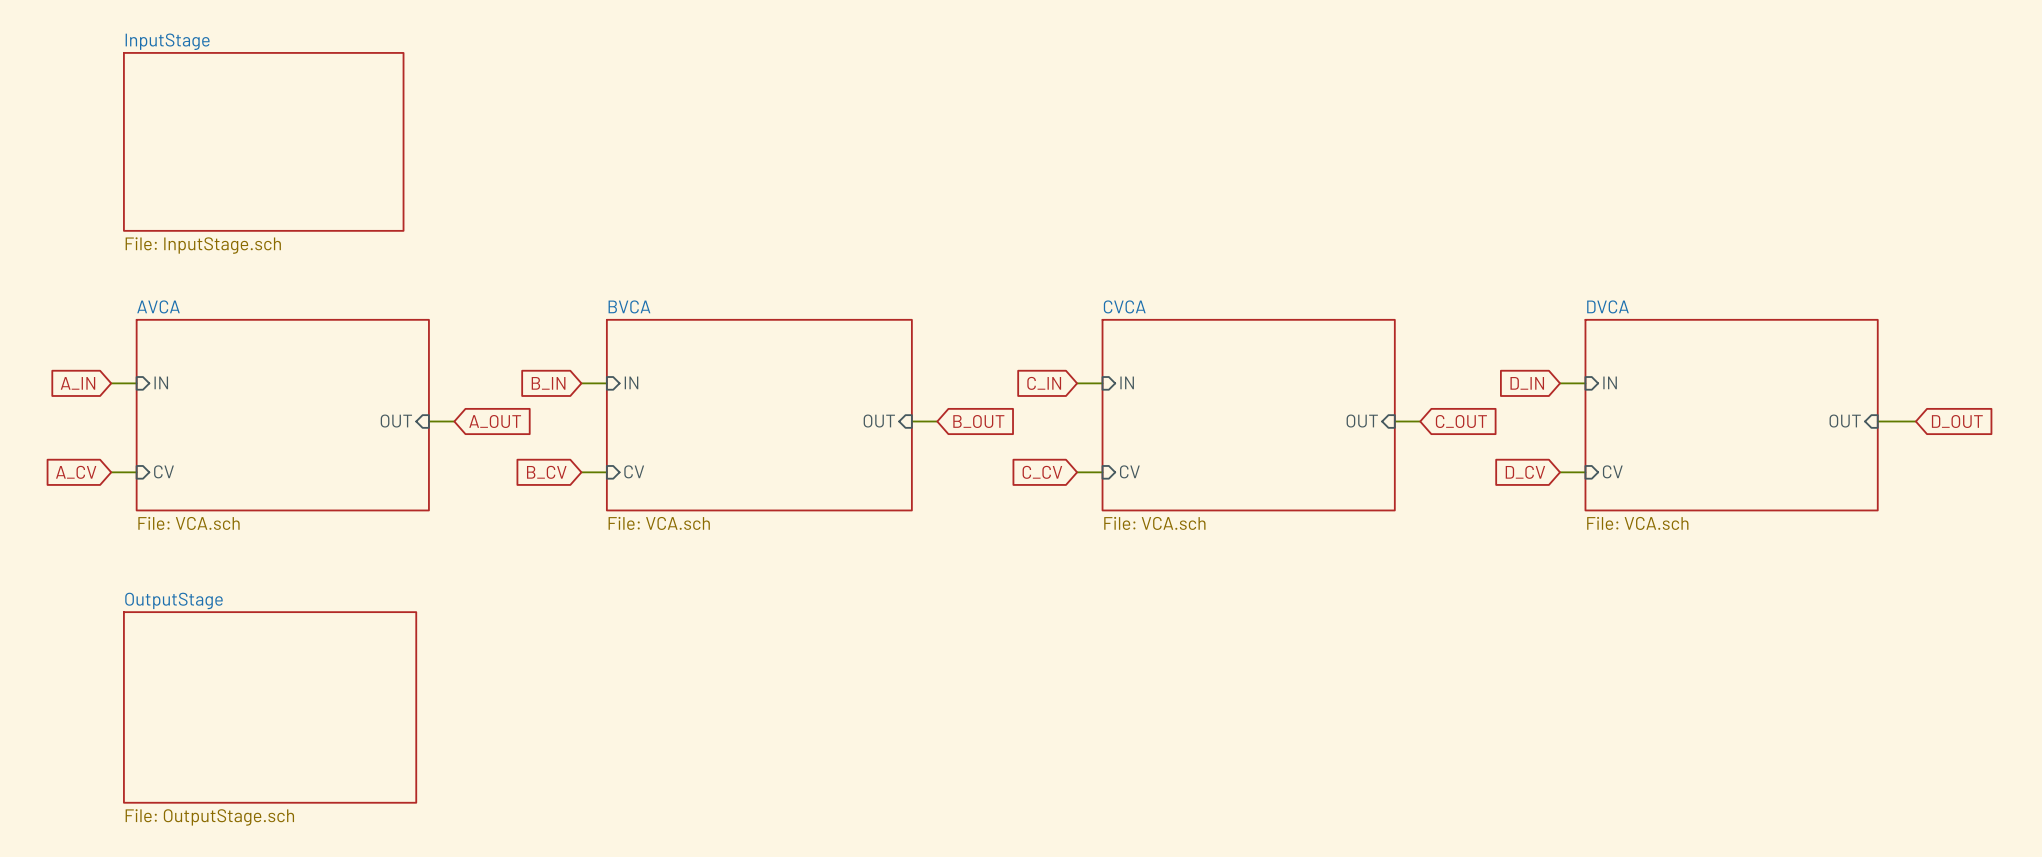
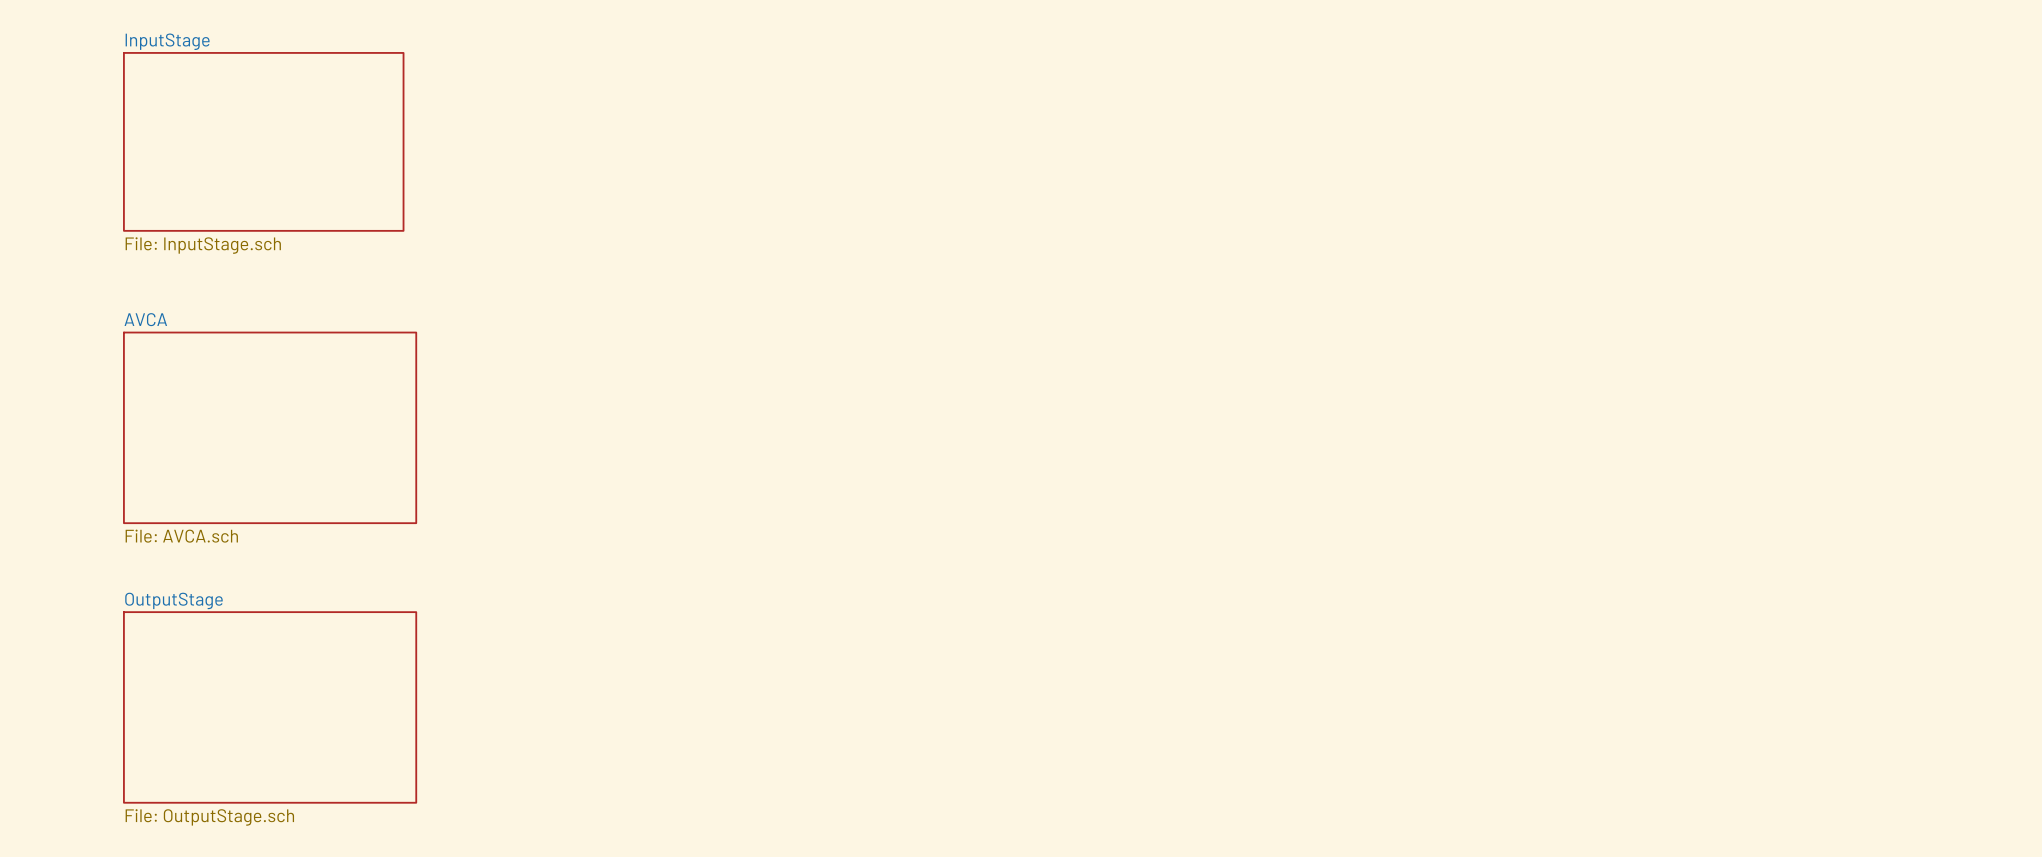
sheet pin: IN (161, 382) -> none
sheet pin: IN (631, 382) -> none
sheet pin: IN (1127, 382) -> none
sheet pin: IN (1610, 382) -> none
global label: A_IN (77, 383) -> none
wire: (111, 383) (136, 383) -> none
global label: B_IN (548, 383) -> none
wire: (581, 383) (606, 383) -> none
global label: C_IN (1044, 383) -> none
wire: (1077, 383) (1102, 383) -> none
global label: D_IN (1527, 383) -> none
wire: (1560, 383) (1585, 383) -> none
sheet AVCA: File: VCA.sch (282, 415) -> none
sheet BVCA: File: VCA.sch (759, 415) -> none
sheet CVCA: File: VCA.sch (1248, 415) -> none
sheet DVCA: File: VCA.sch (1731, 415) -> none
sheet pin: OUT (396, 421) -> none
wire: (428, 421) (454, 421) -> none
global label: A_OUT (495, 421) -> none
sheet pin: OUT (879, 421) -> none
wire: (911, 421) (937, 421) -> none
global label: B_OUT (978, 421) -> none
sheet pin: OUT (1362, 421) -> none
wire: (1394, 421) (1420, 421) -> none
global label: C_OUT (1461, 421) -> none
sheet pin: OUT (1845, 421) -> none
wire: (1877, 421) (1915, 421) -> none
global label: D_OUT (1957, 421) -> none
sheet AVCA: none -> File: AVCA.sch (270, 427)
sheet pin: CV (163, 471) -> none
sheet pin: CV (634, 471) -> none
sheet pin: CV (1129, 471) -> none
sheet pin: CV (1612, 471) -> none
global label: A_CV (76, 472) -> none
wire: (111, 472) (136, 472) -> none
global label: B_CV (546, 472) -> none
wire: (581, 472) (606, 472) -> none
global label: C_CV (1042, 472) -> none
wire: (1077, 472) (1102, 472) -> none
global label: D_CV (1525, 472) -> none
wire: (1560, 472) (1585, 472) -> none

